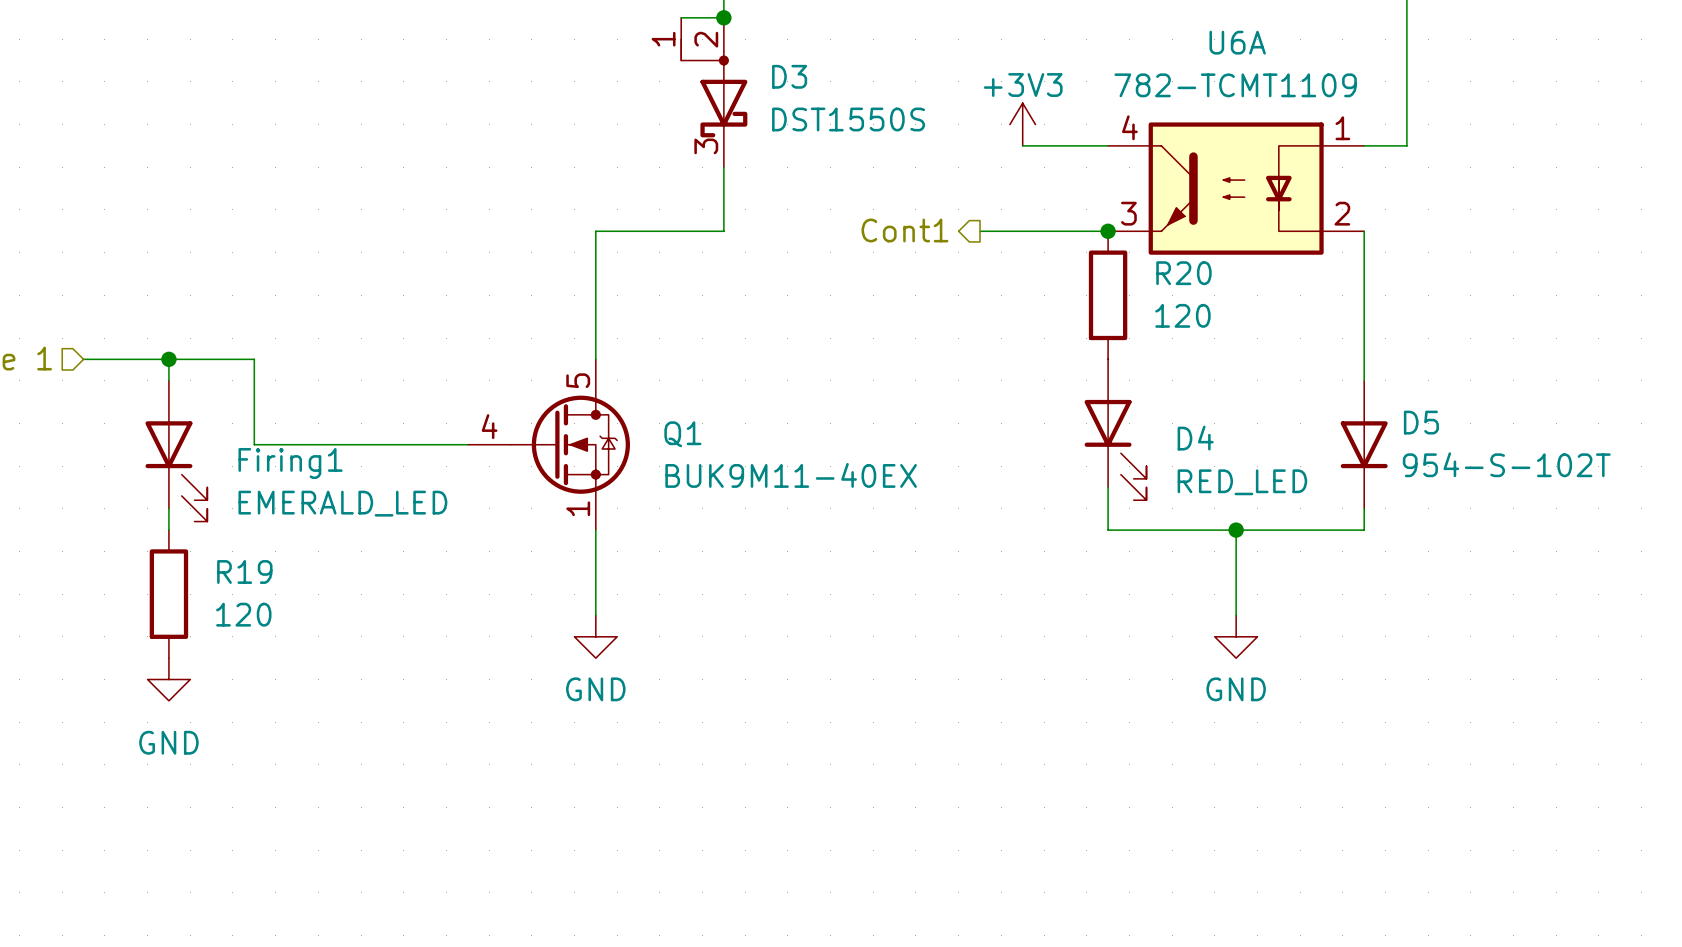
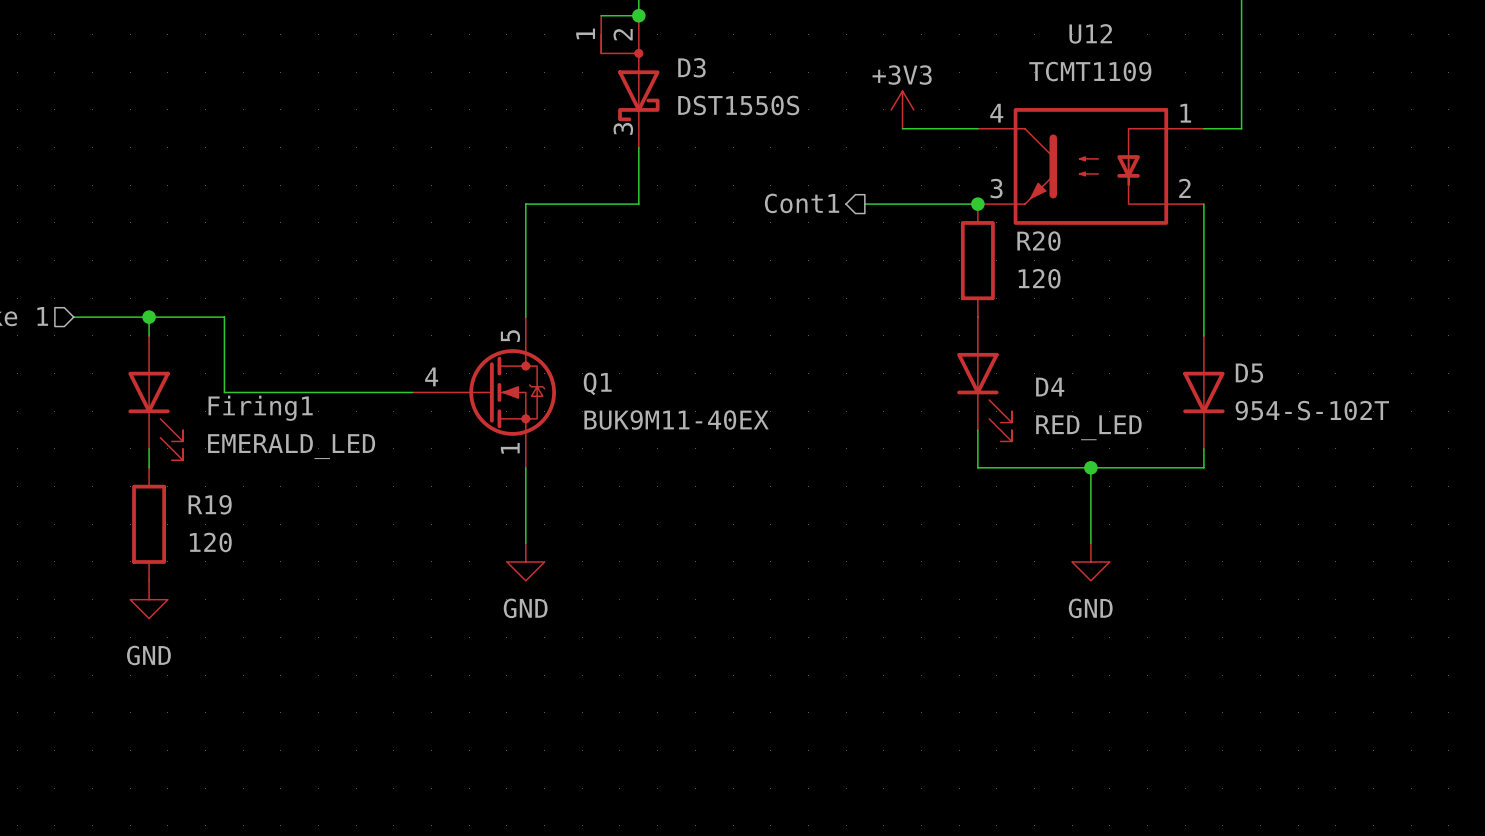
U6A name: U6A (1237, 42) -> U12 (1090, 33)
U6A value: 782-TCMT1109 (1235, 85) -> TCMT1109 (1090, 71)

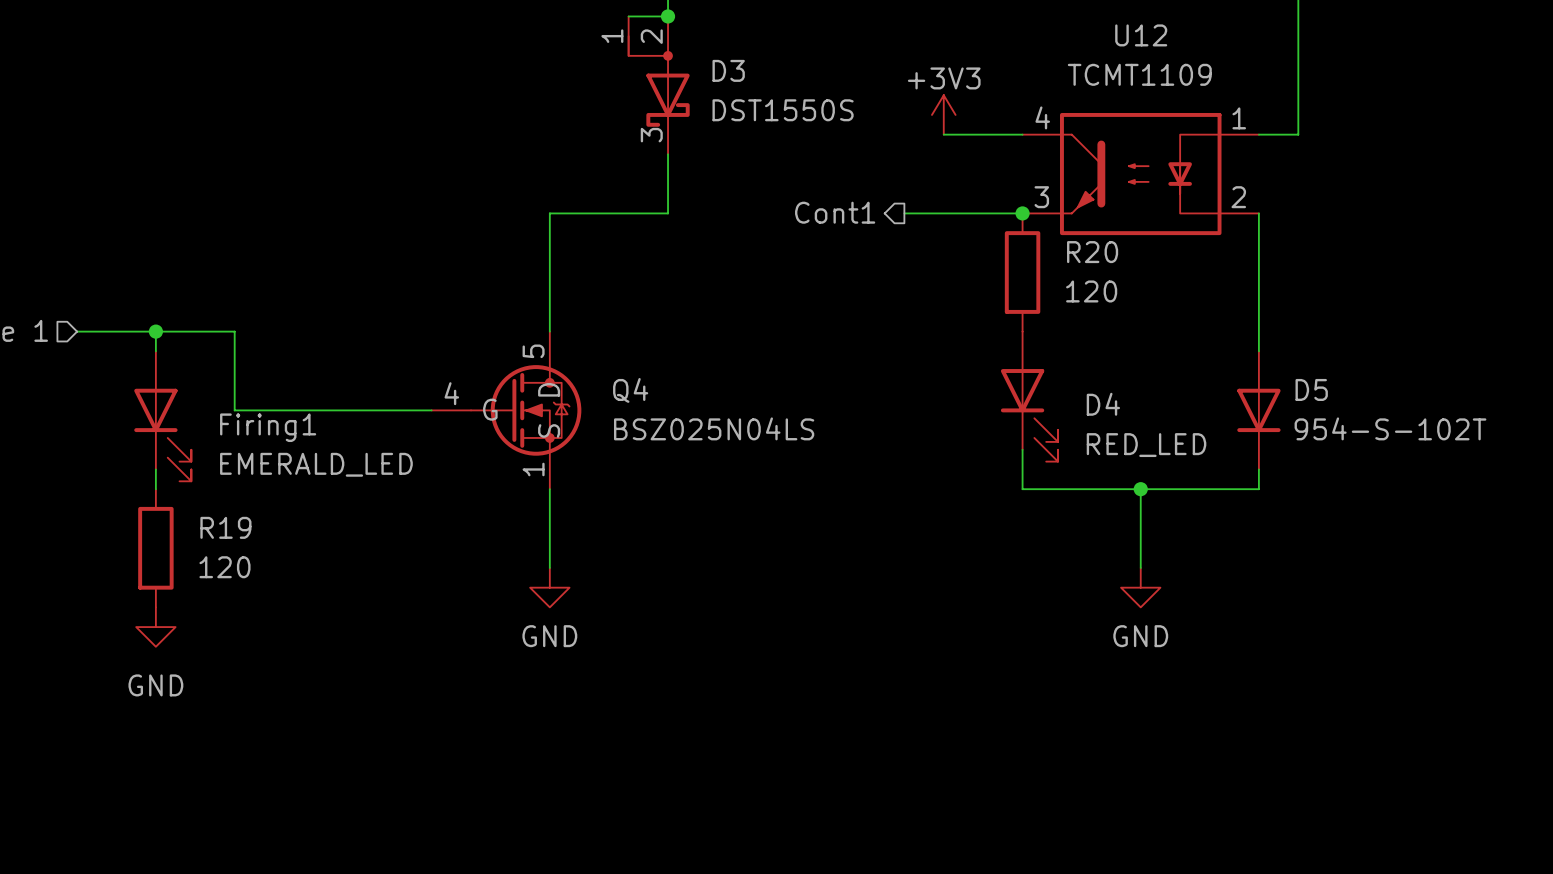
Q1 pin name: none -> D (549, 389)
Q1 name: Q1 (597, 383) -> Q4 (630, 390)
Q1 pin name: none -> G (490, 409)
Q1 pin name: none -> S (549, 430)
Q1 value: BUK9M11-40EX (676, 420) -> BSZ025N04LS (714, 428)

